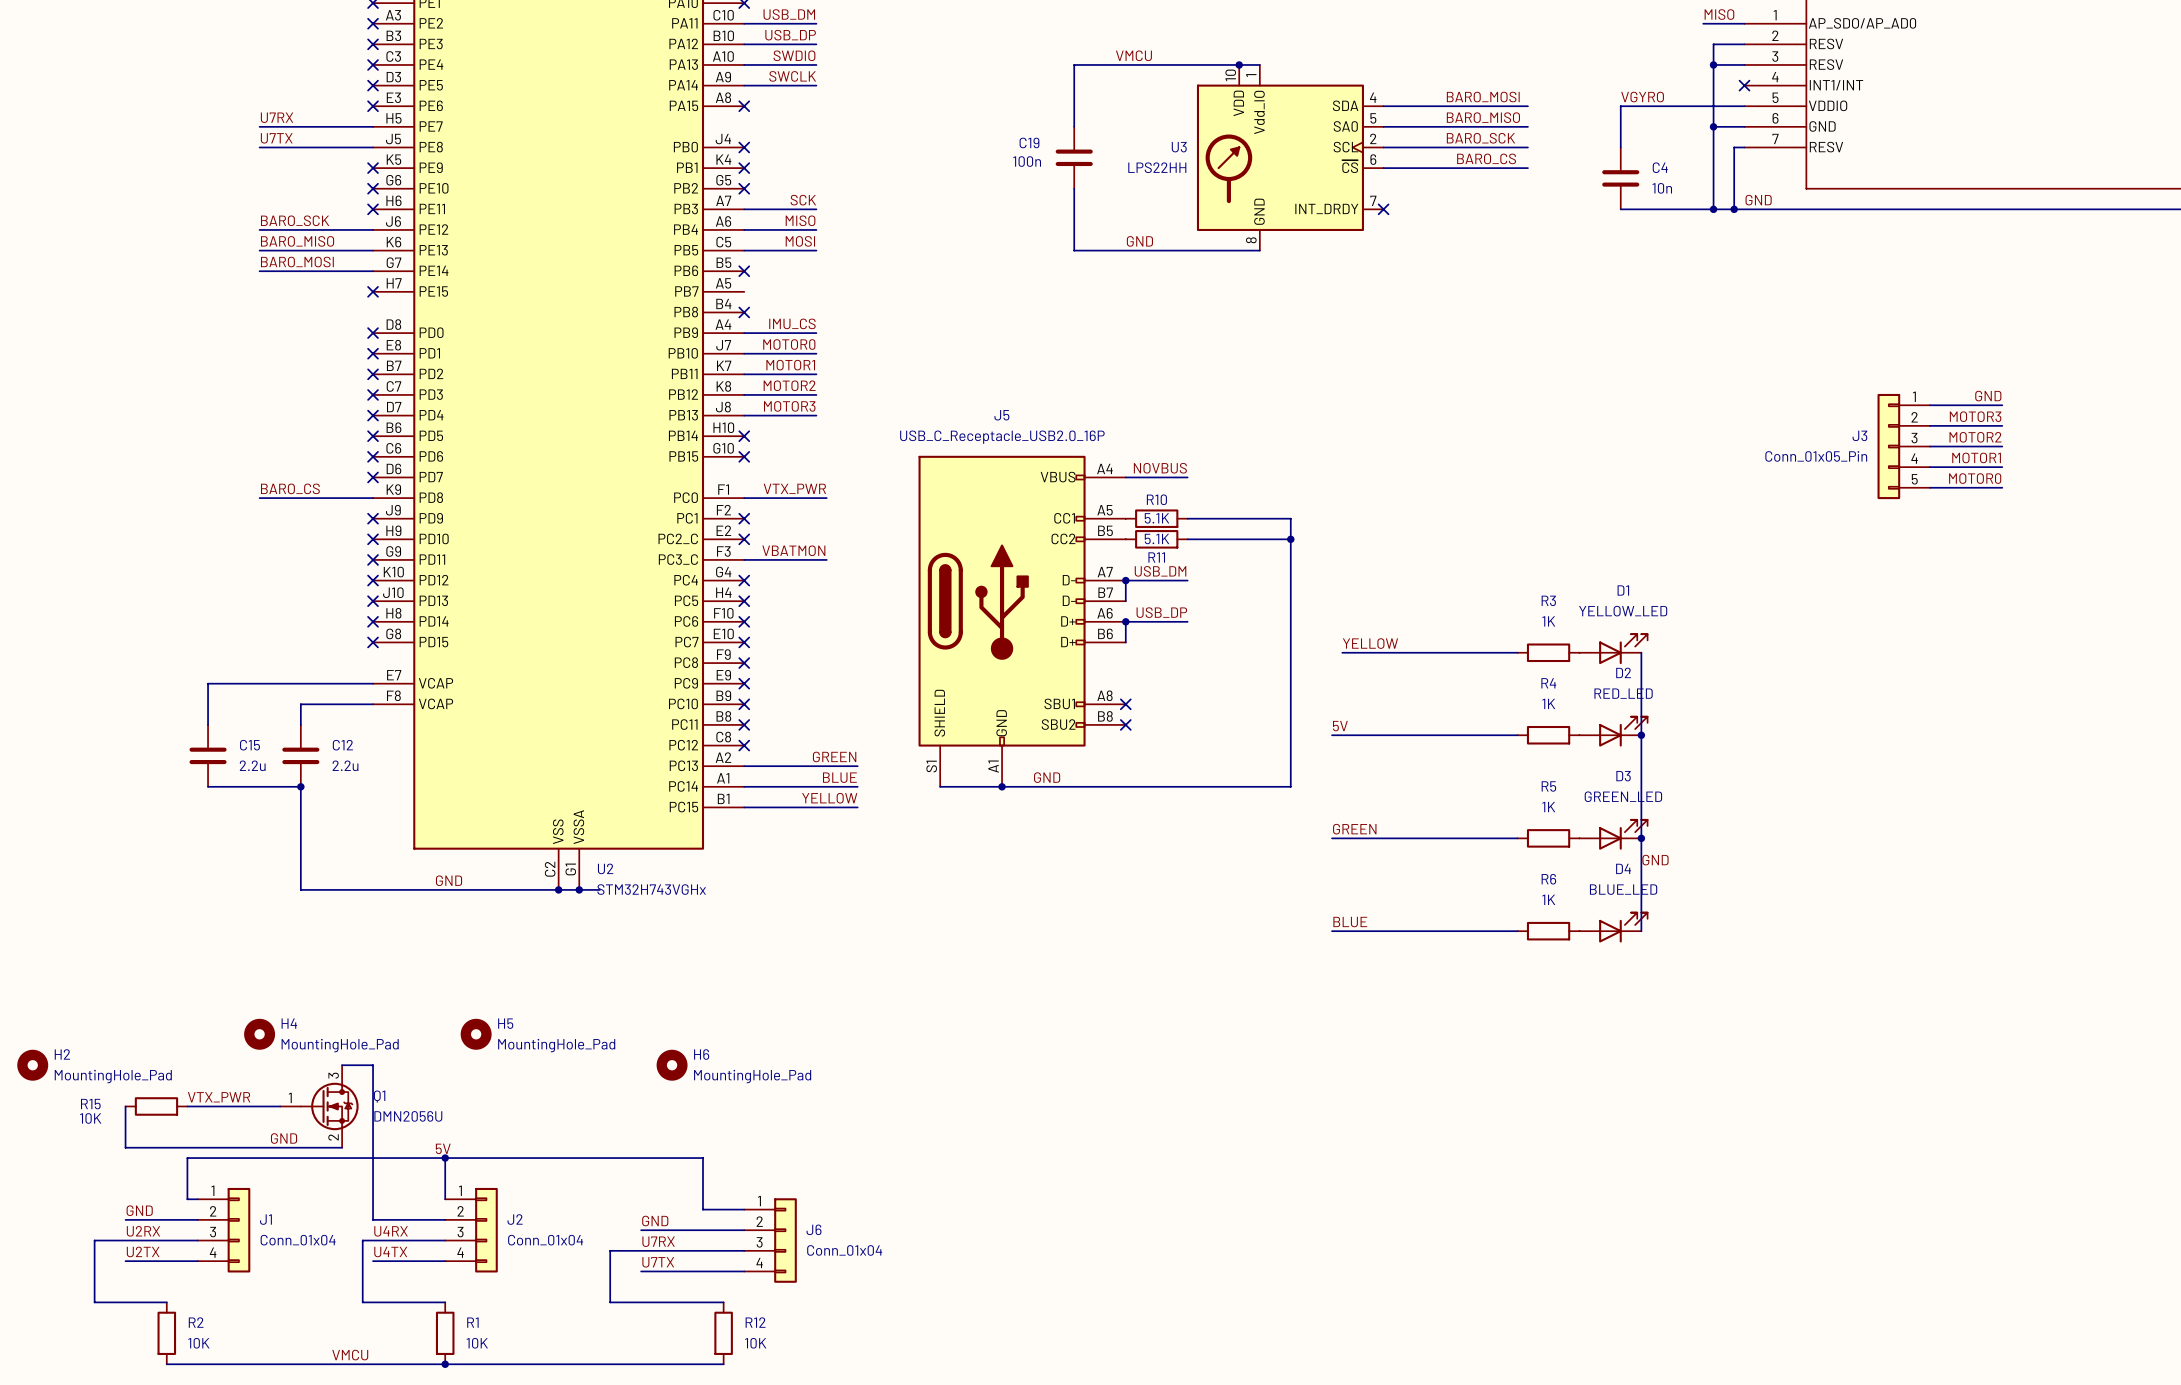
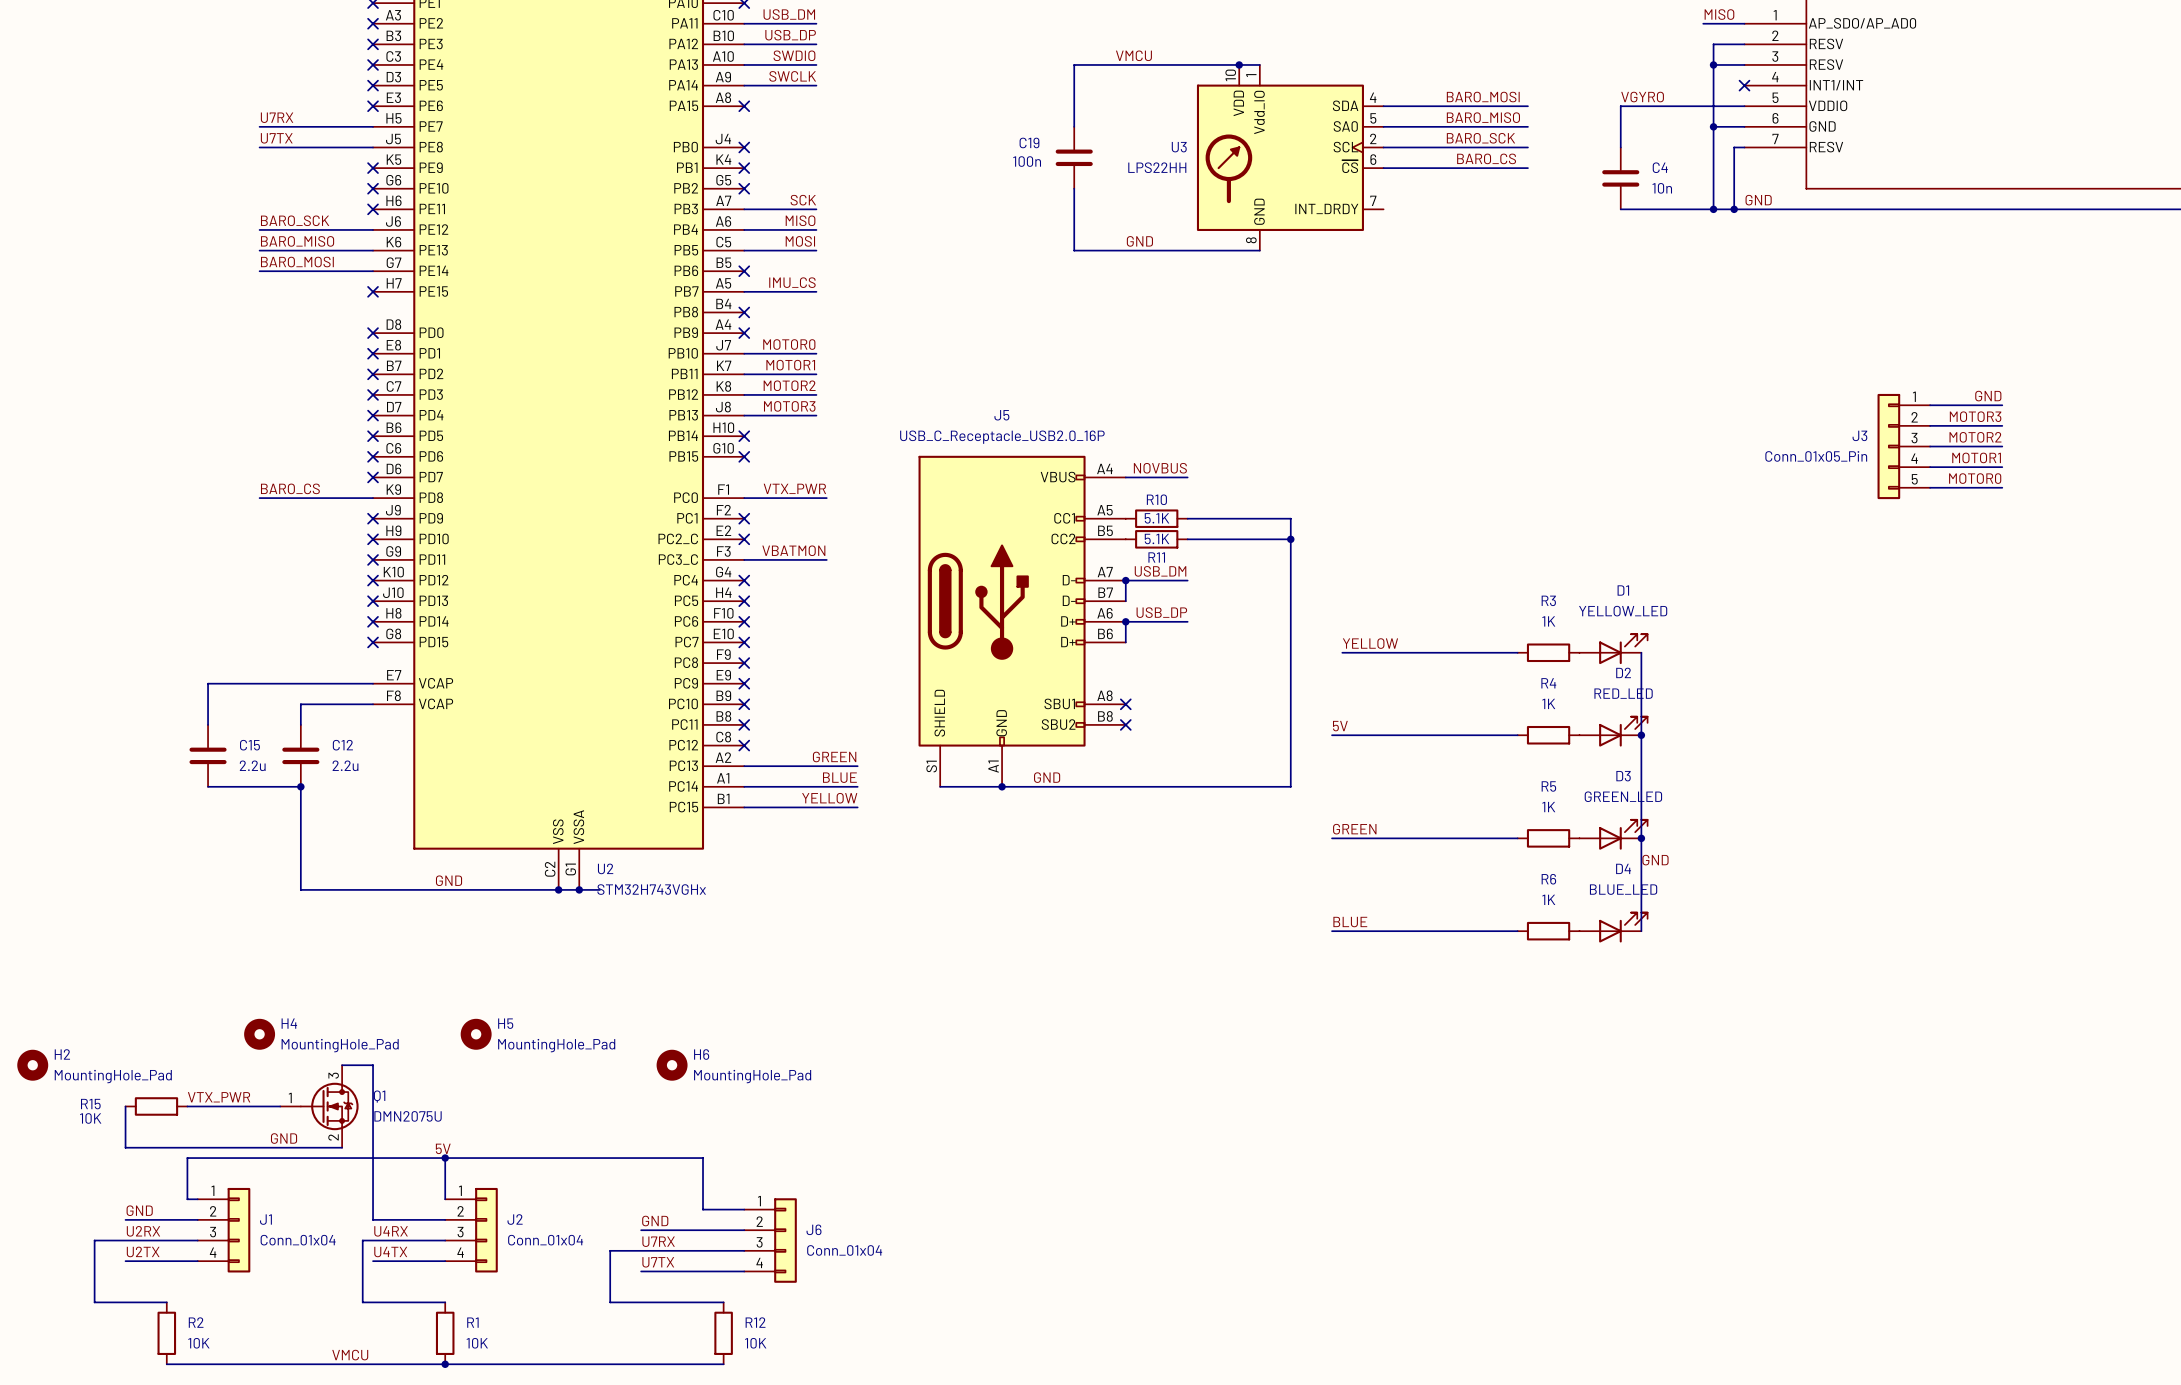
no-connect mark: (1383, 209) -> none
label position: IMU_CS (792, 323) -> IMU_CS (792, 282)
wire: (744, 333) (816, 333) -> (744, 291) (816, 291)
no-connect mark: none -> (744, 333)
Q1 value: DMN2056U (408, 1116) -> DMN2075U (408, 1116)

